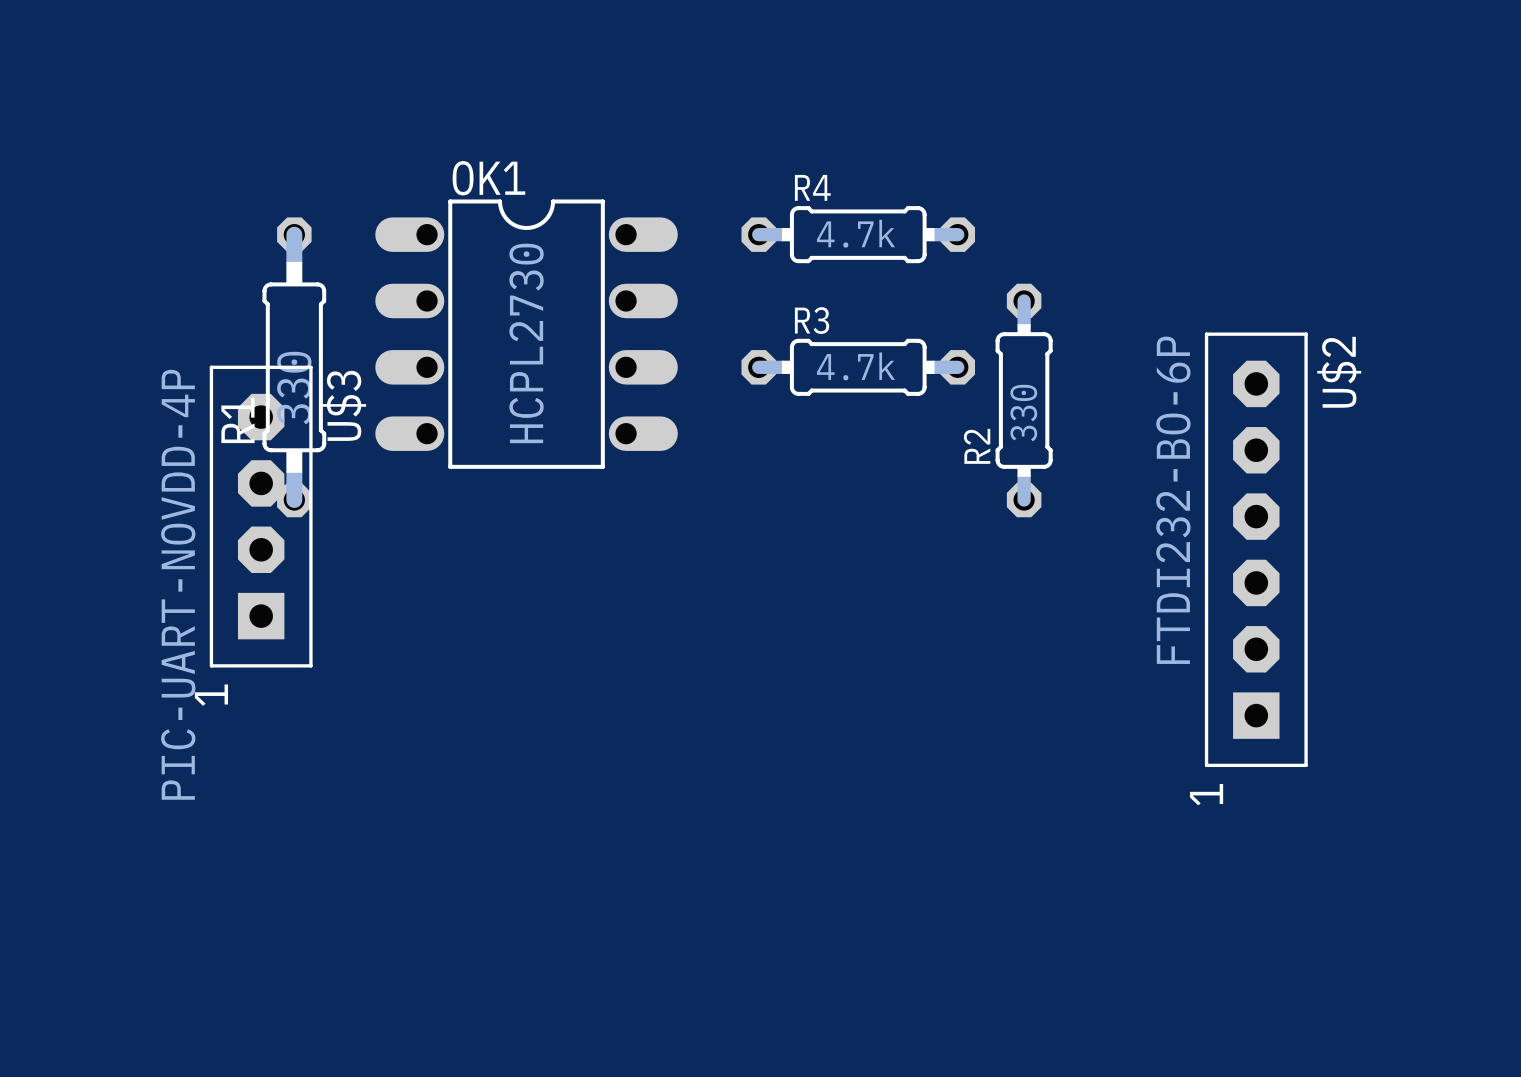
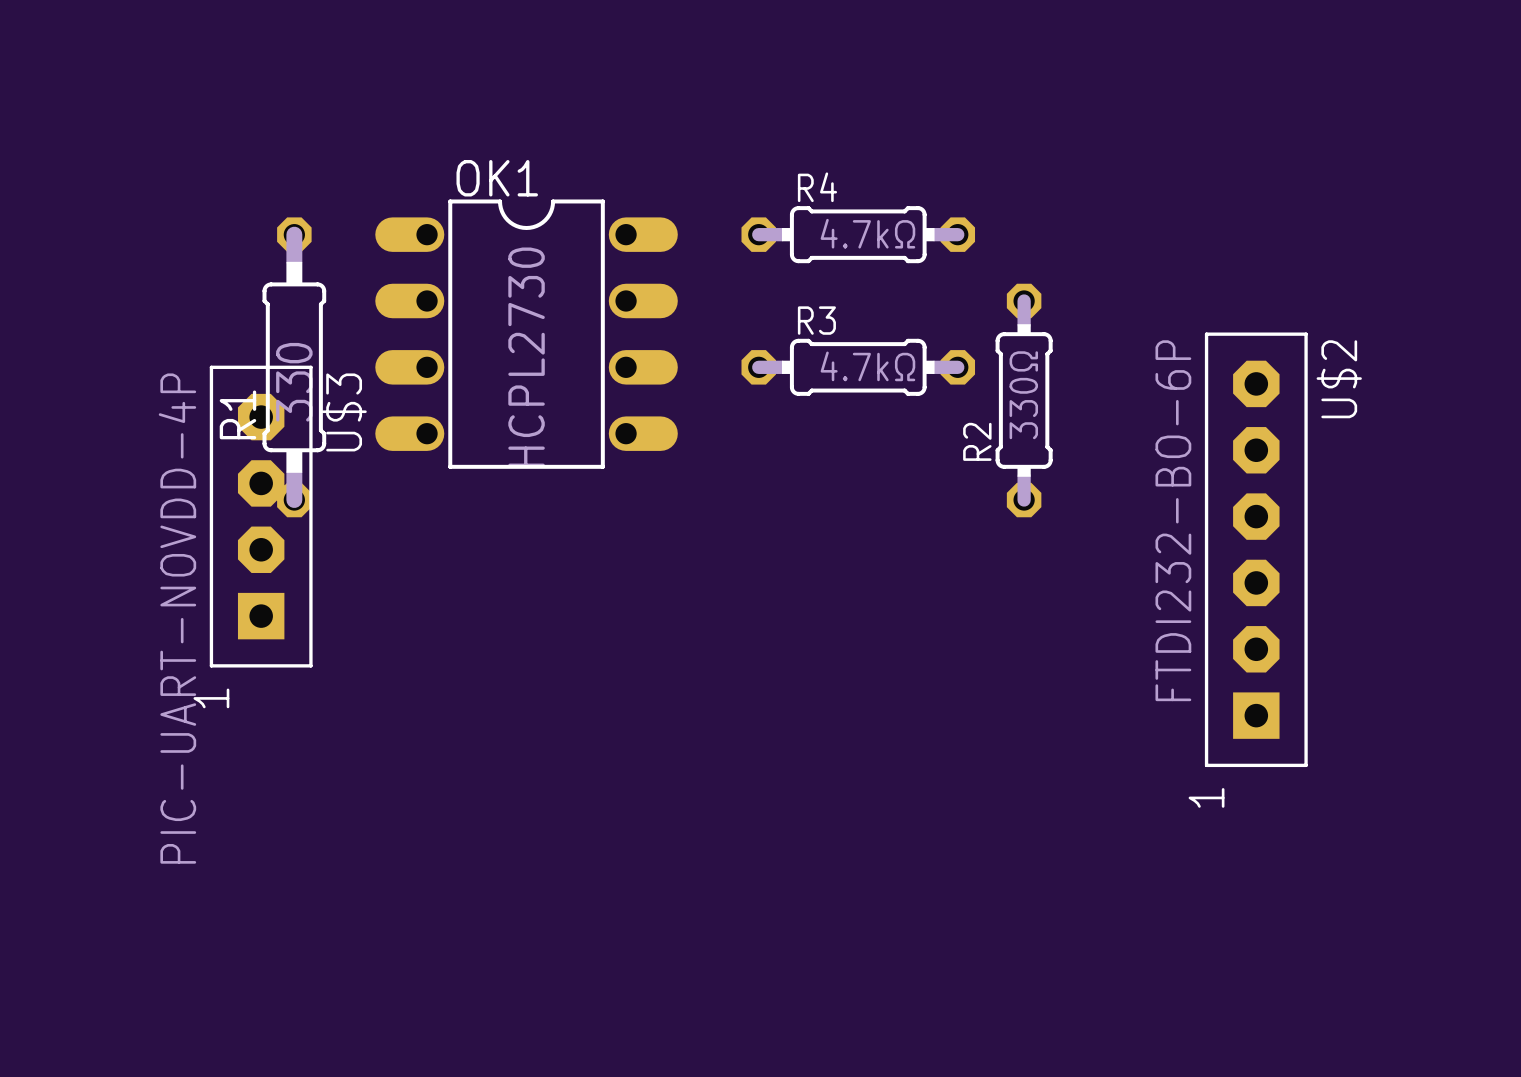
R4 value: 4.7k (855, 233) -> 4.7kΩ (867, 233)
R3 value: 4.7k (855, 366) -> 4.7kΩ (867, 366)
R2 value: 330 (1023, 413) -> 330Ω (1023, 395)

